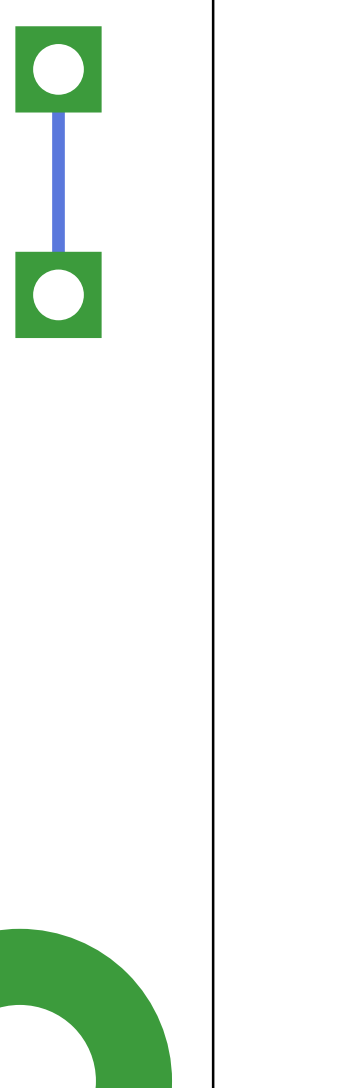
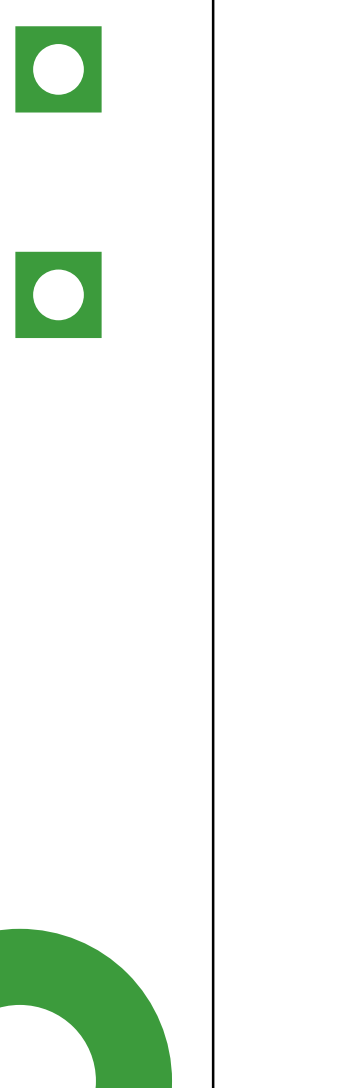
track: (58, 69) (58, 294) -> none

